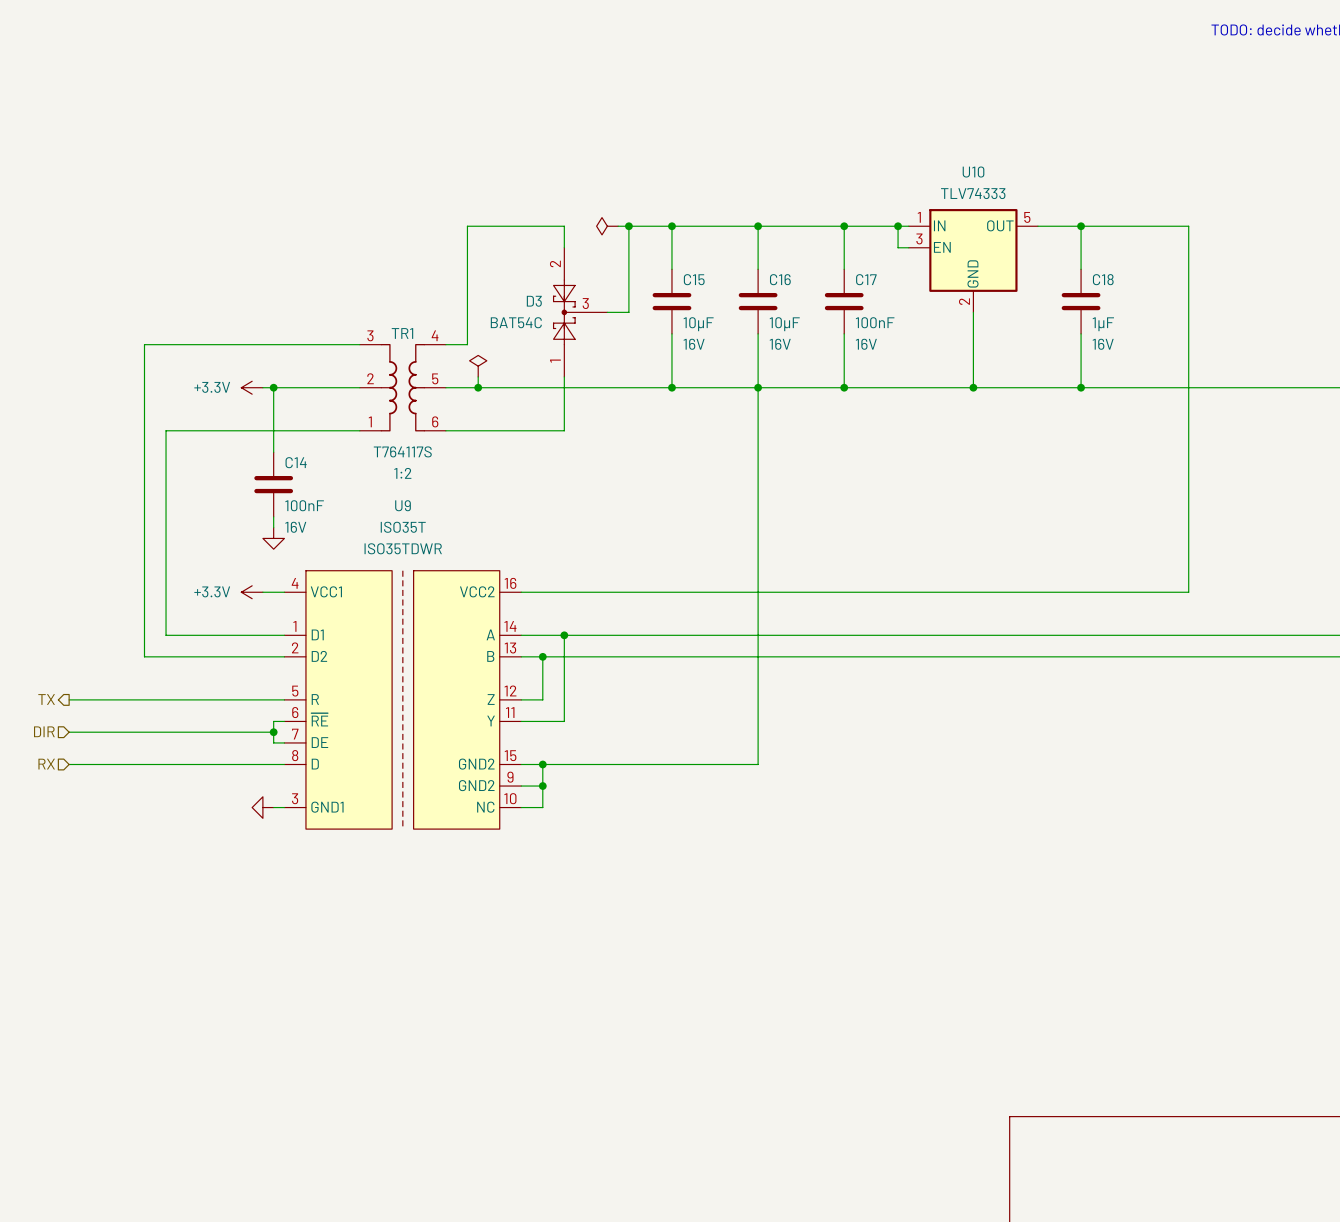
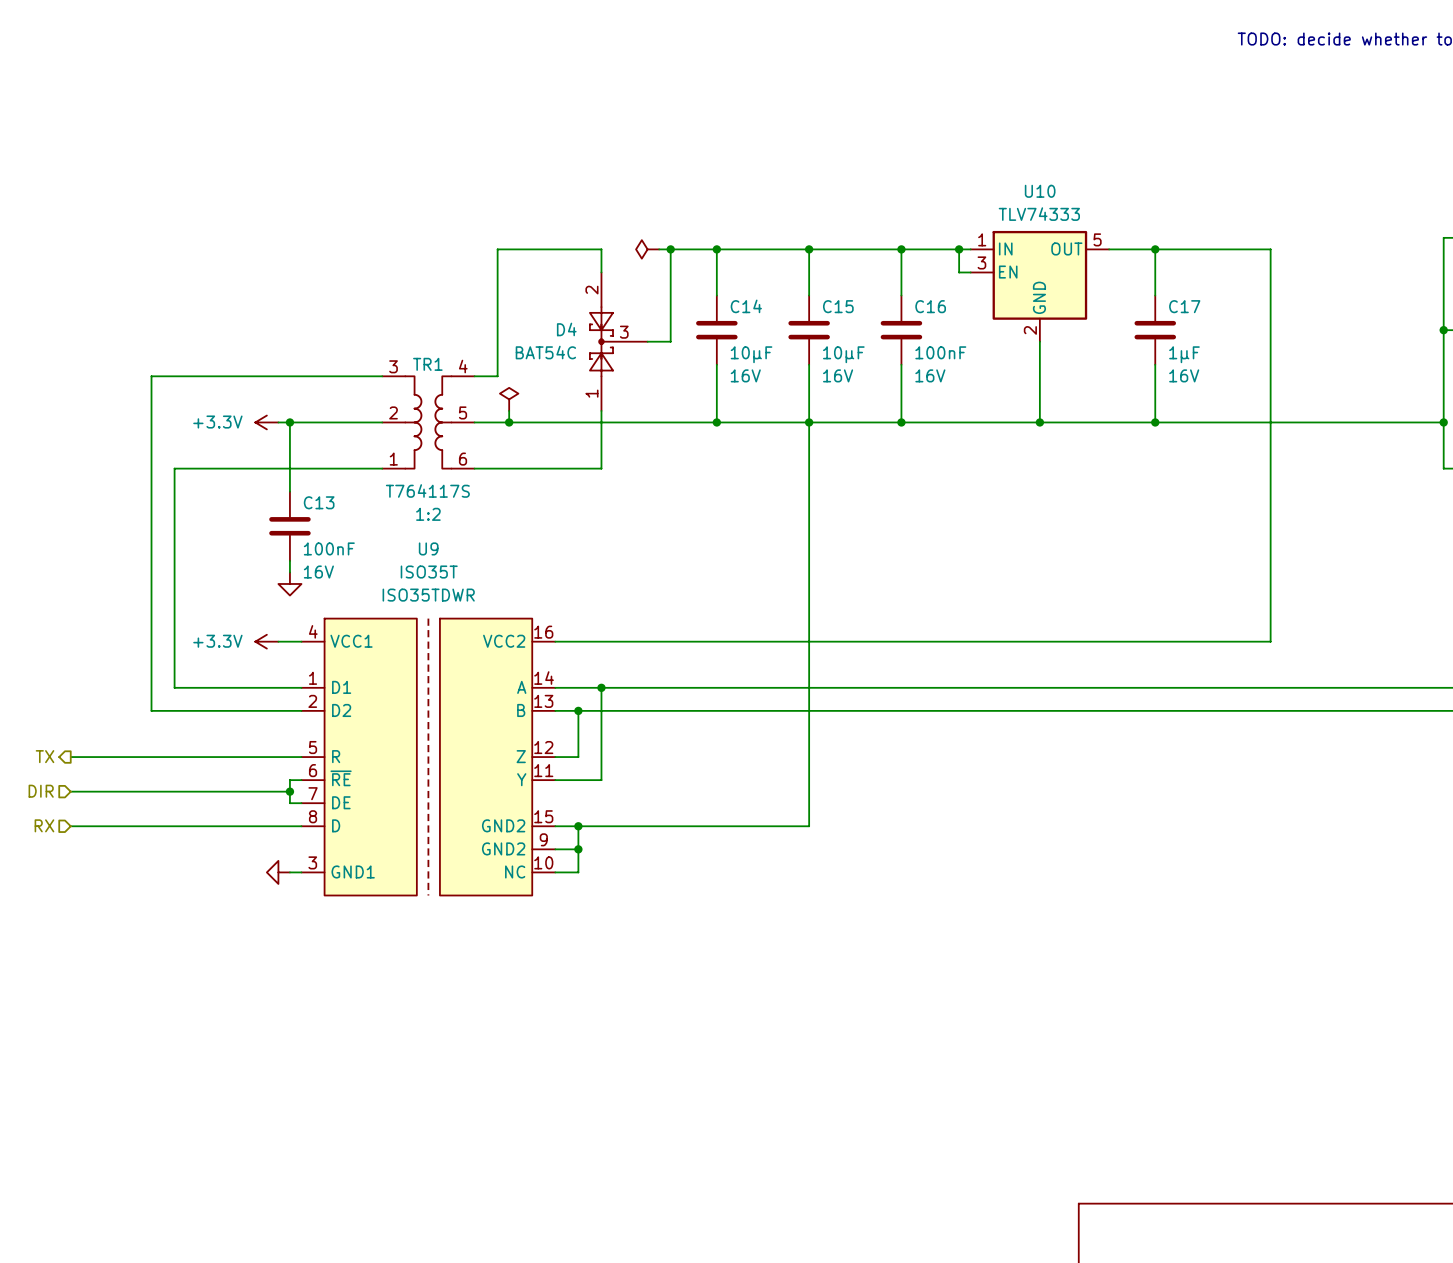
C15 name: C15 (694, 279) -> C14 (746, 306)
C16 name: C16 (780, 279) -> C15 (838, 306)
C17 name: C17 (866, 279) -> C16 (930, 306)
C18 name: C18 (1103, 279) -> C17 (1184, 306)
D3 name: D3 (534, 301) -> D4 (566, 329)
C14 name: C14 (296, 462) -> C13 (319, 502)

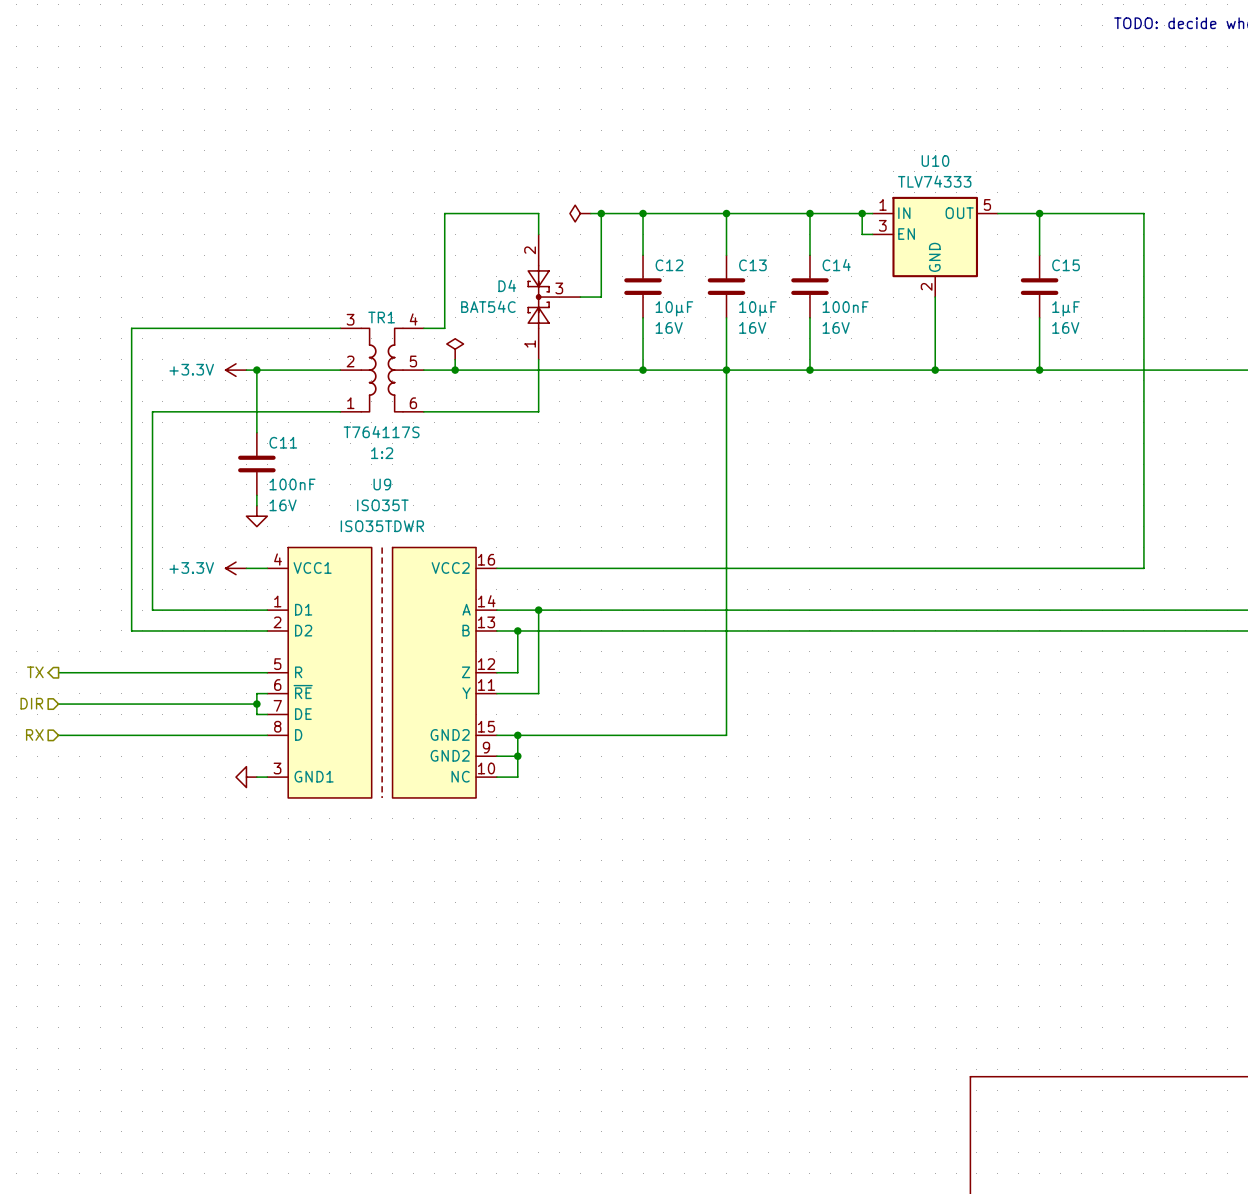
C14 name: C14 (746, 306) -> C12 (669, 265)
C15 name: C15 (838, 306) -> C13 (752, 265)
C16 name: C16 (930, 306) -> C14 (836, 265)
C17 name: C17 (1184, 306) -> C15 (1066, 265)
C13 name: C13 (319, 502) -> C11 (283, 442)

